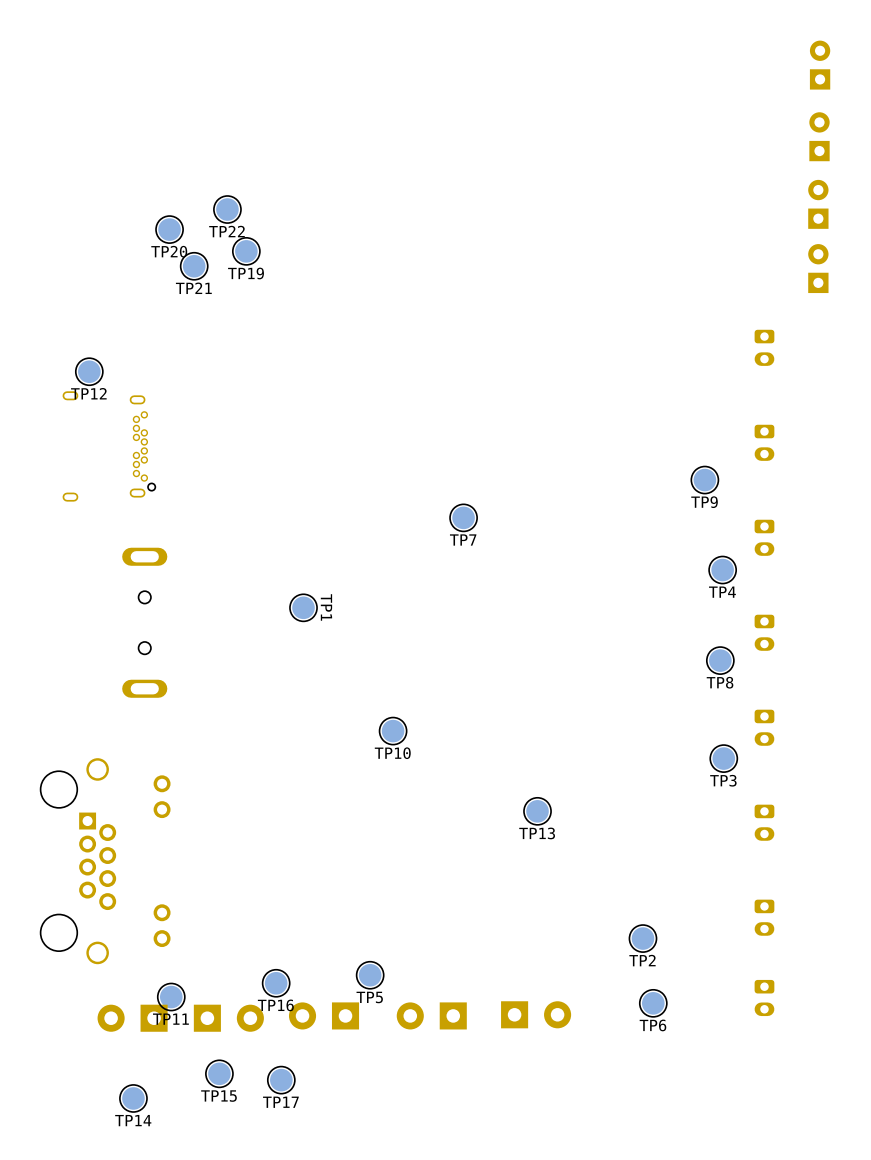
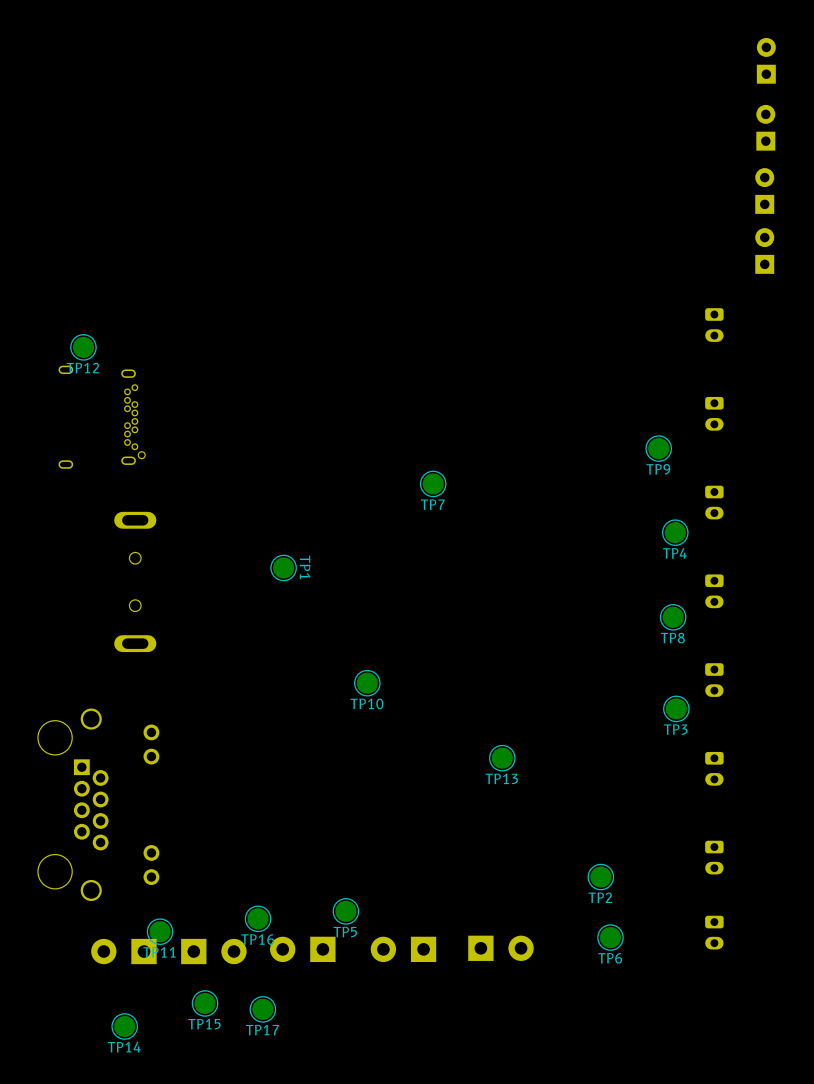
TP22: (227, 209) -> none
TP20: (169, 229) -> none
TP19: (246, 251) -> none
TP21: (194, 266) -> none

